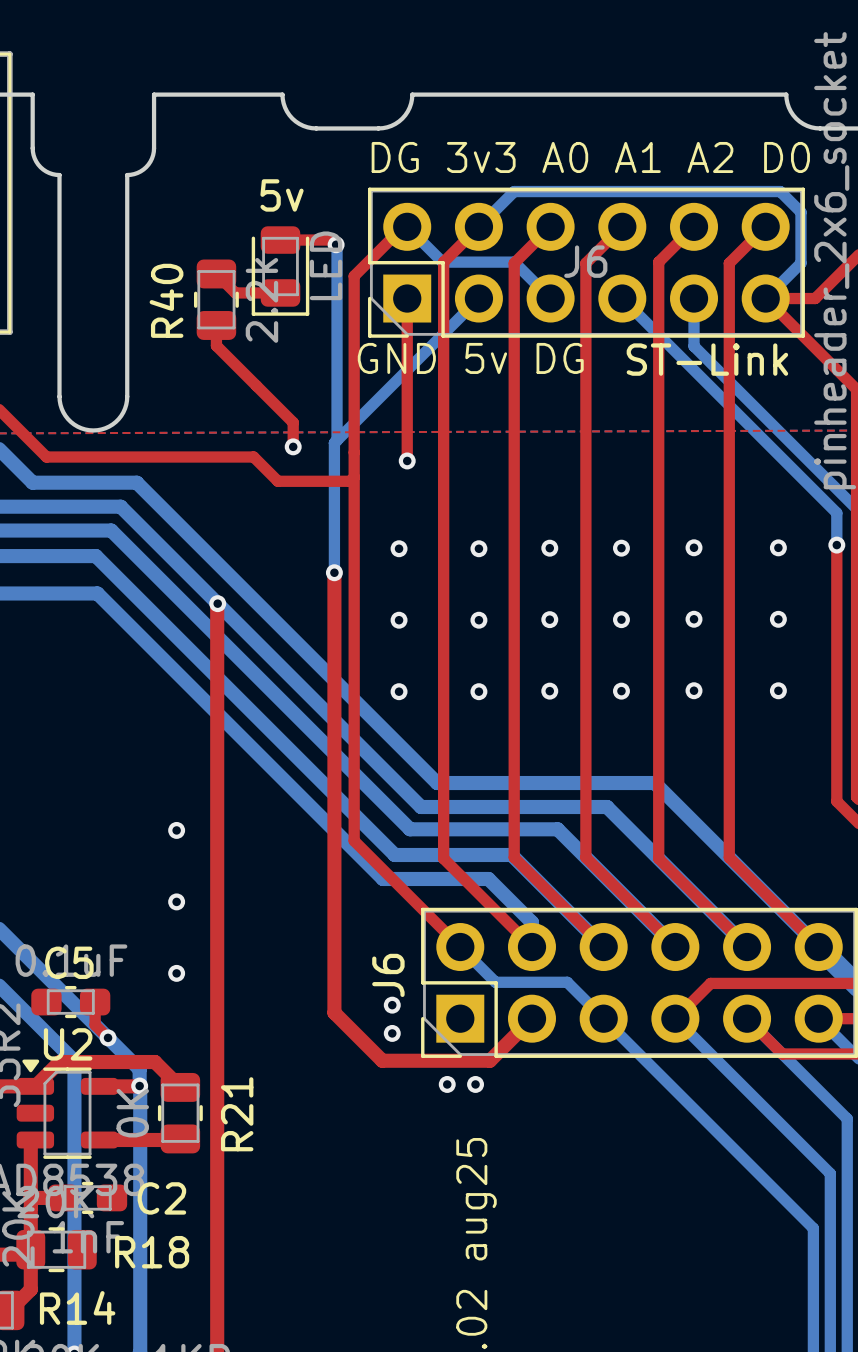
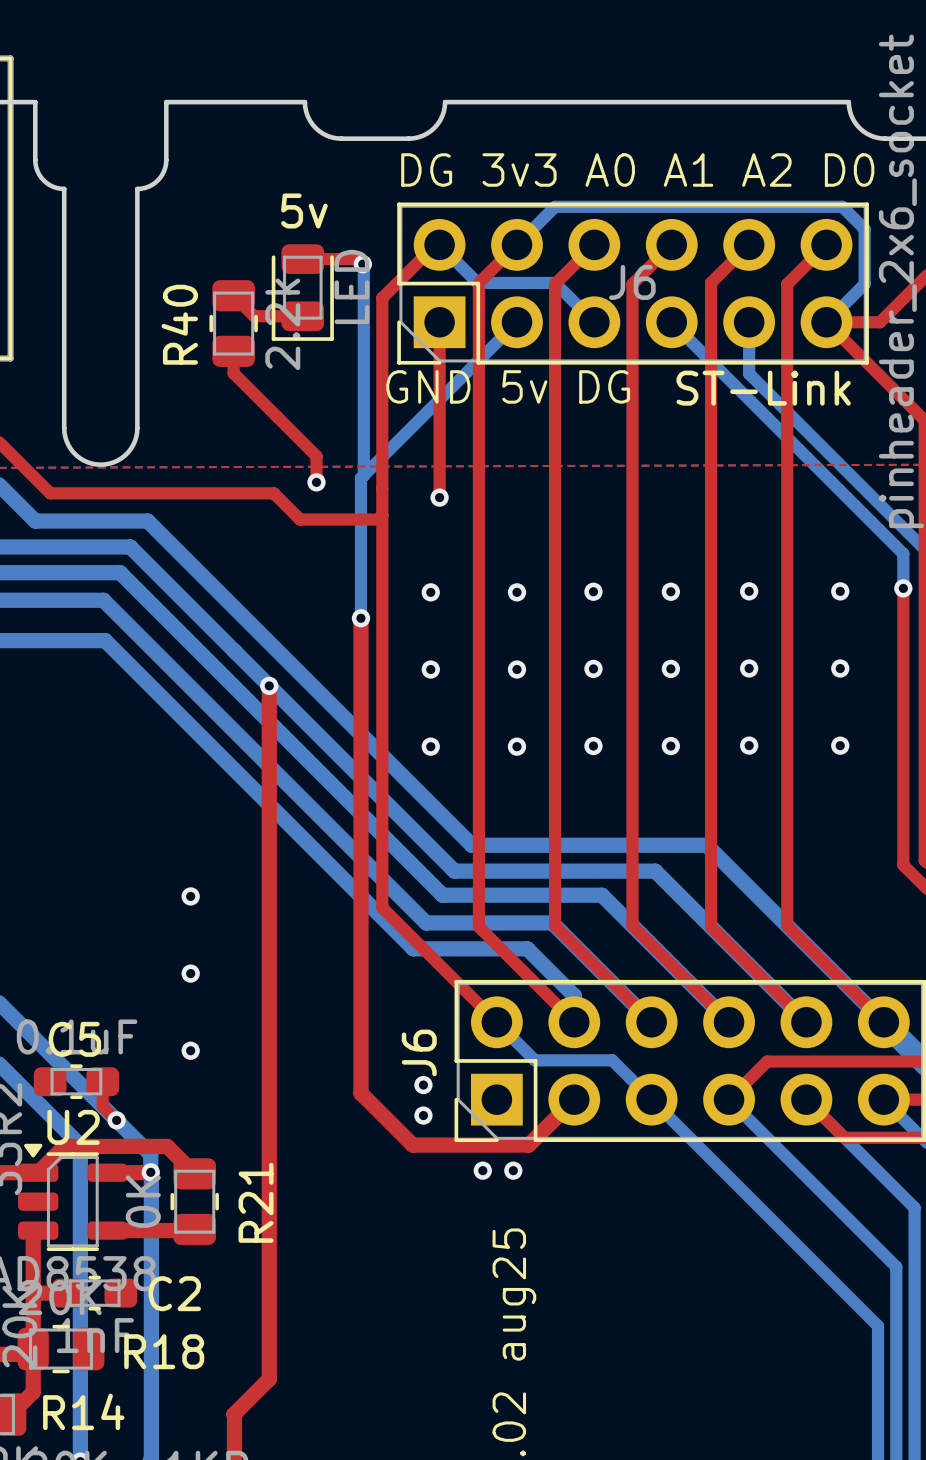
top track: (217, 603) (217, 1310) -> (269, 685) (269, 1379) (234, 1414)
via position: (217, 603) -> (269, 685)

